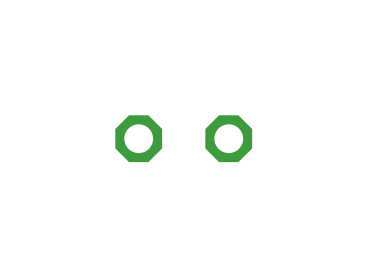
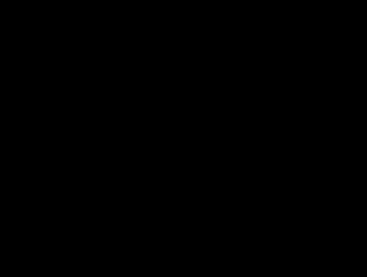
part: (183, 138) -> none

